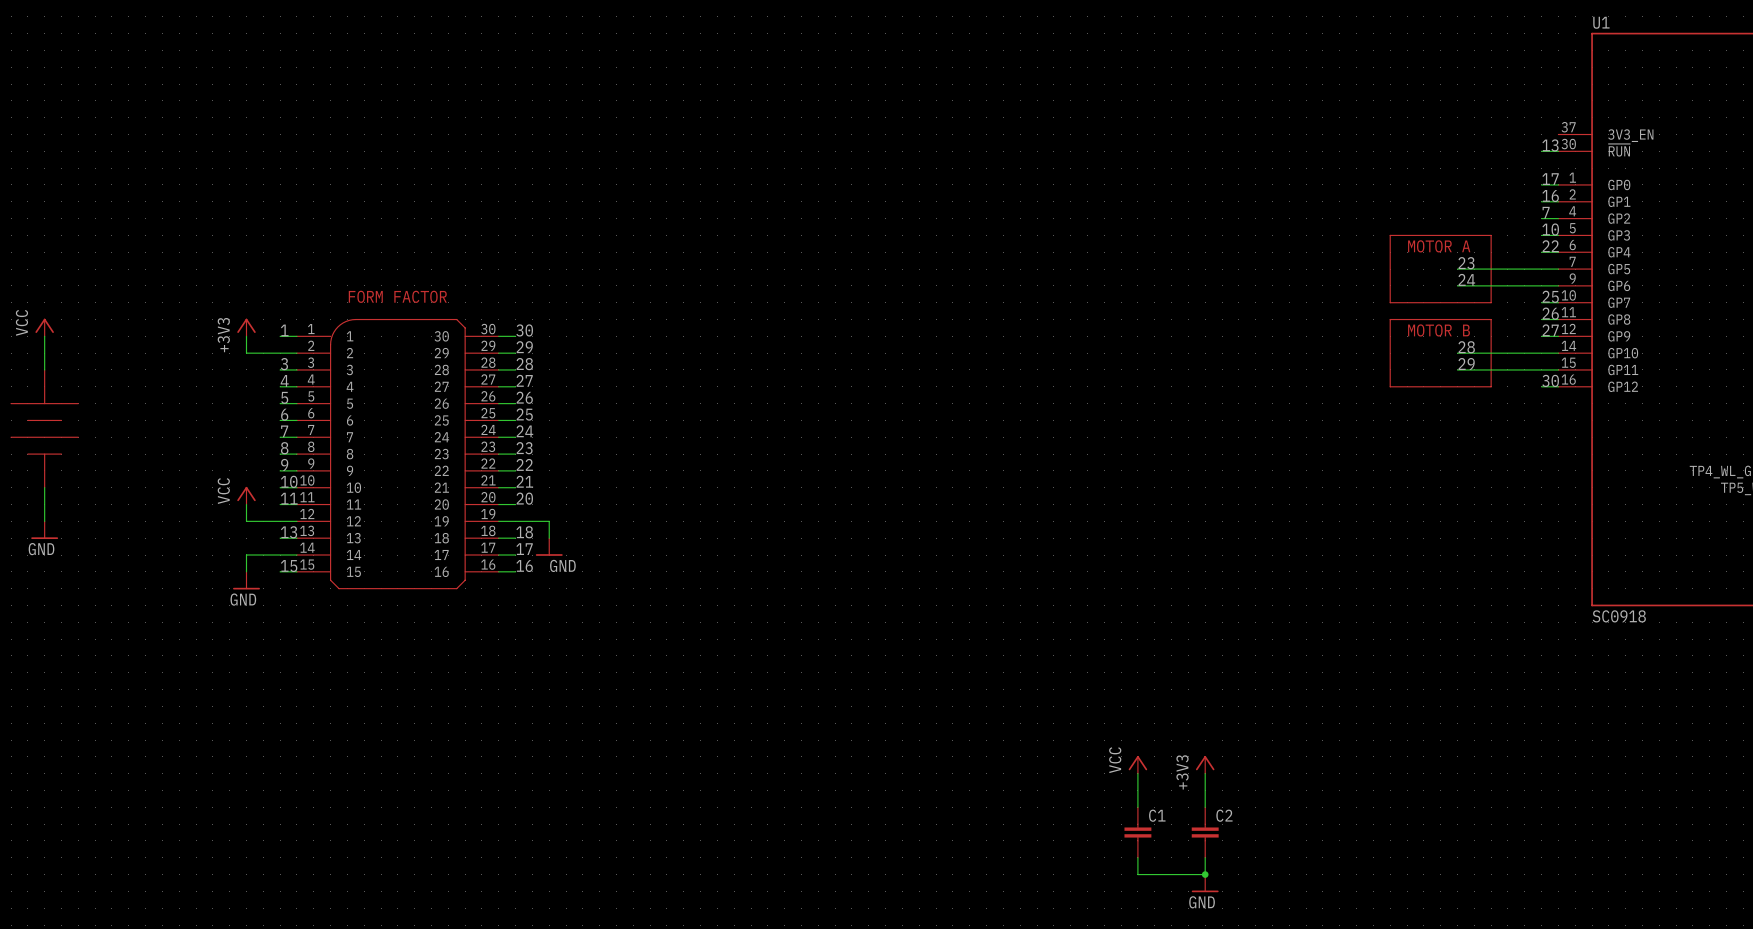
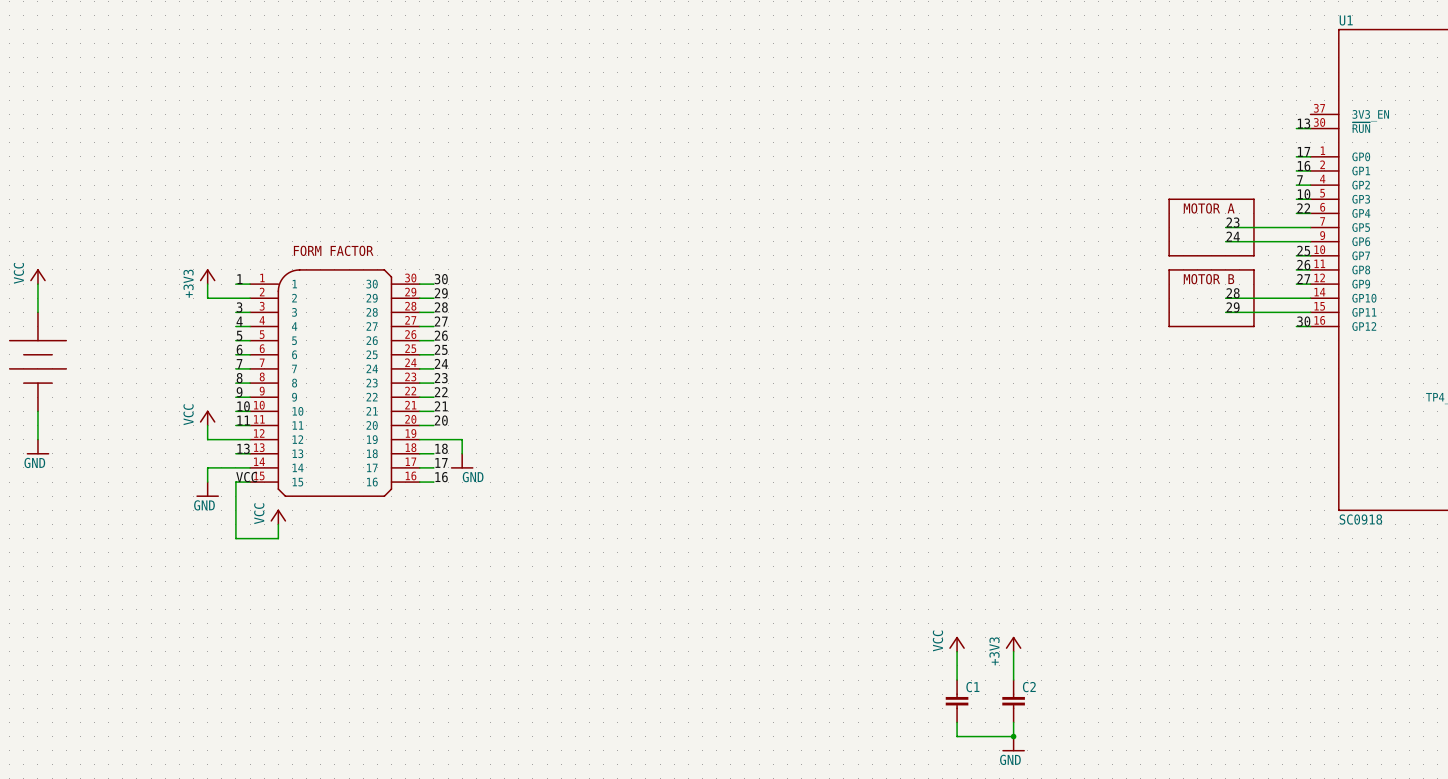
label: 15 (289, 566) -> VCC (246, 477)
wire: none -> (235, 482) (235, 538) (278, 538) (278, 524)
power symbol: none -> VCC (278, 517)

